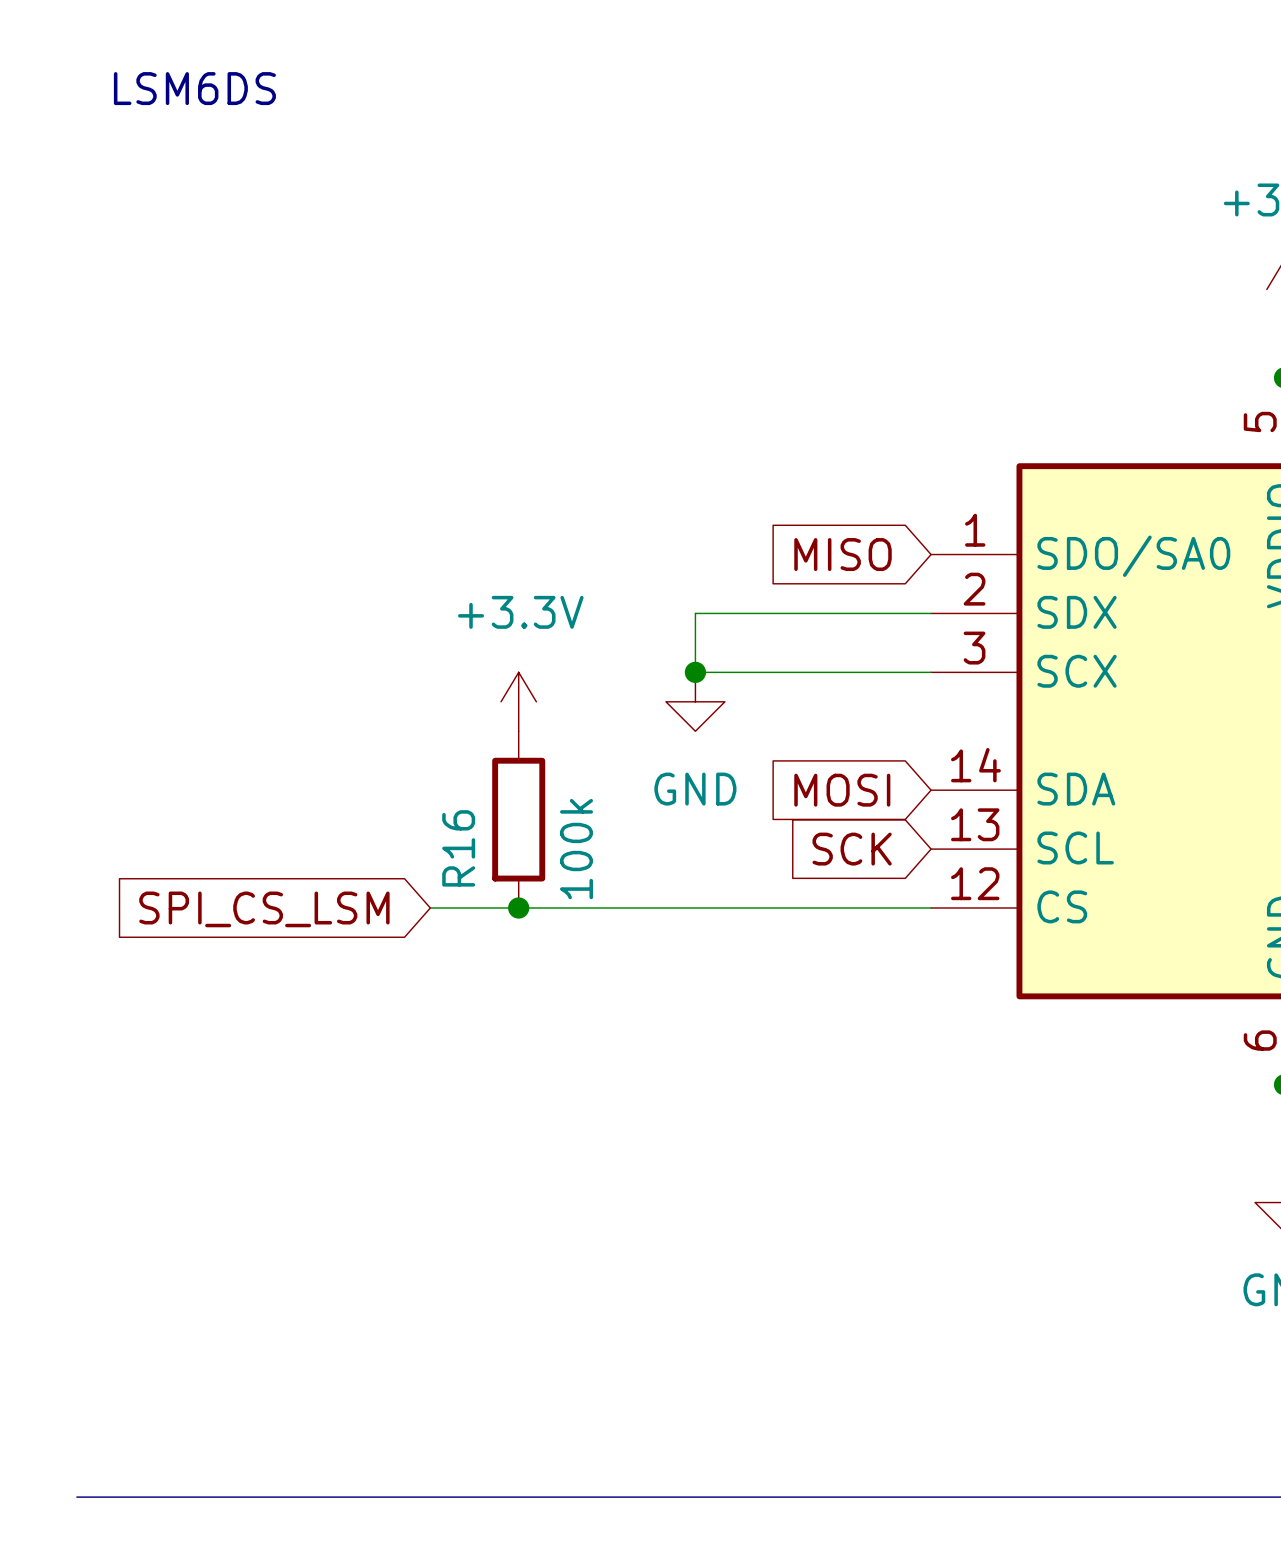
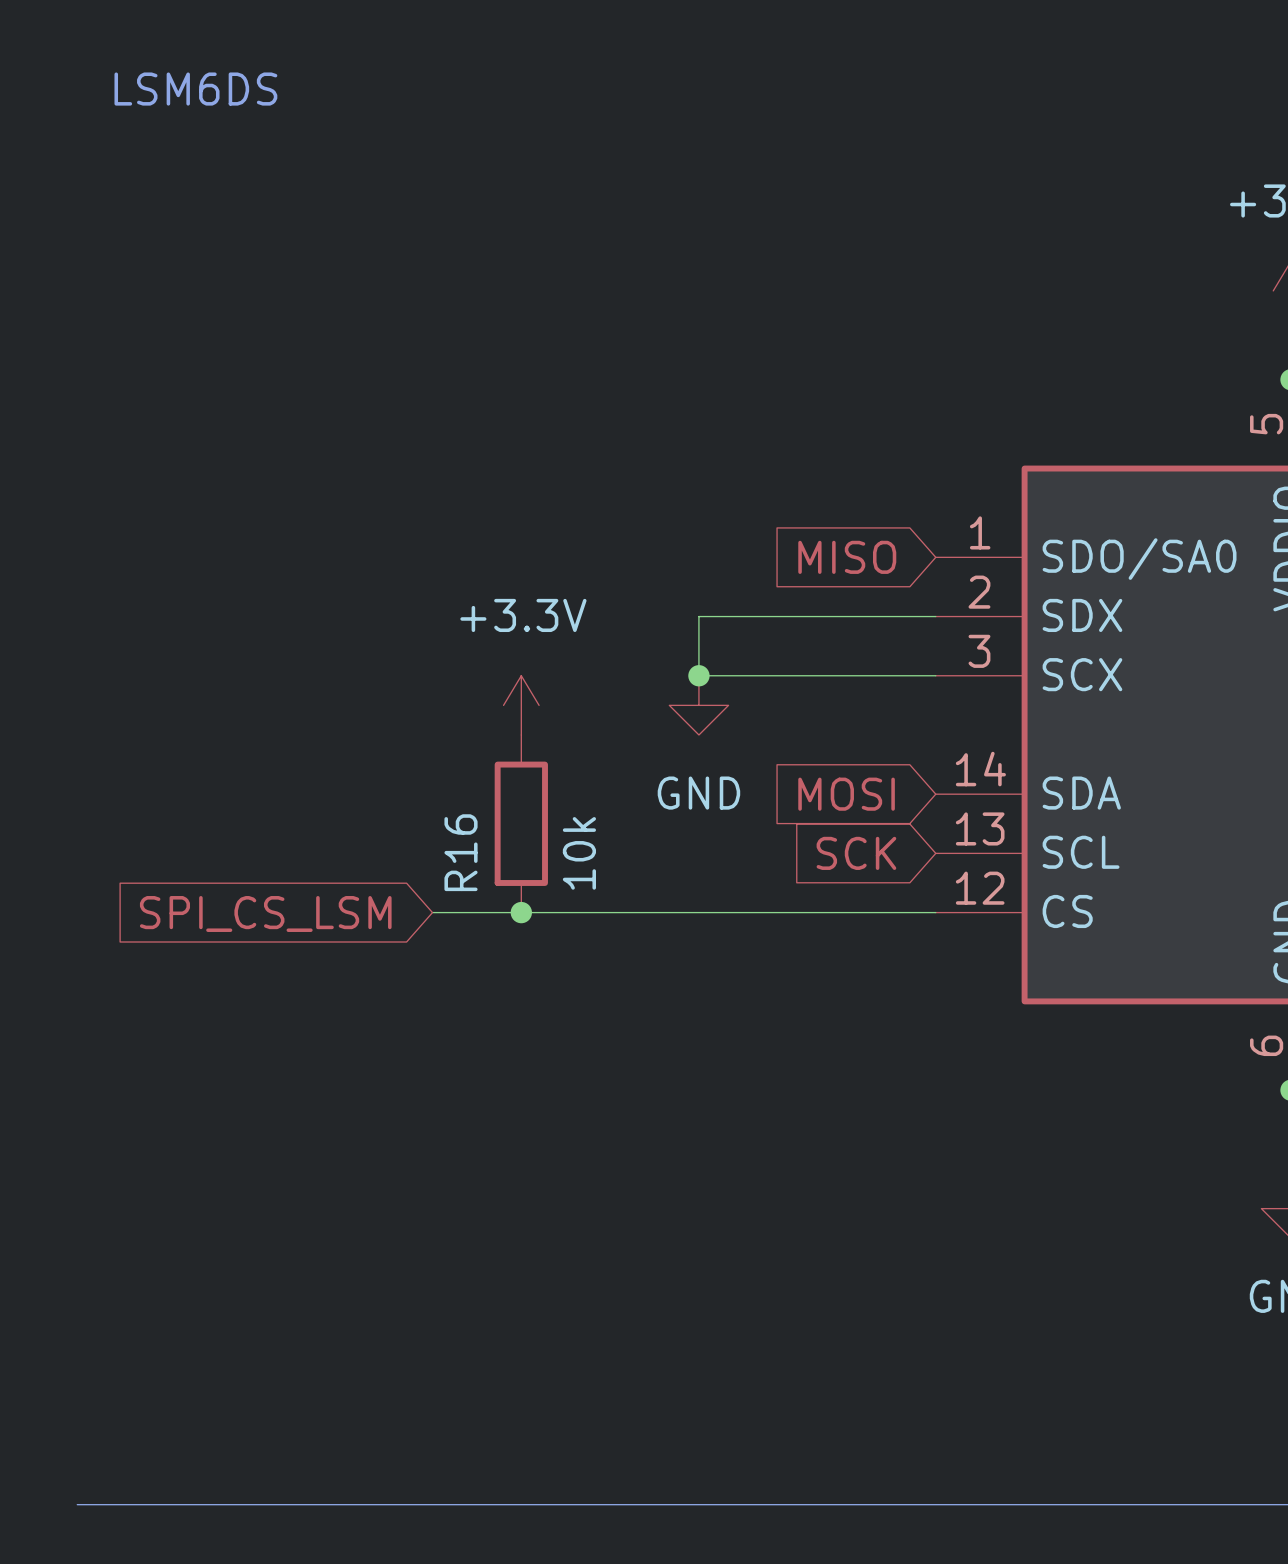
R16 value: 100k (576, 849) -> 10k (579, 853)

